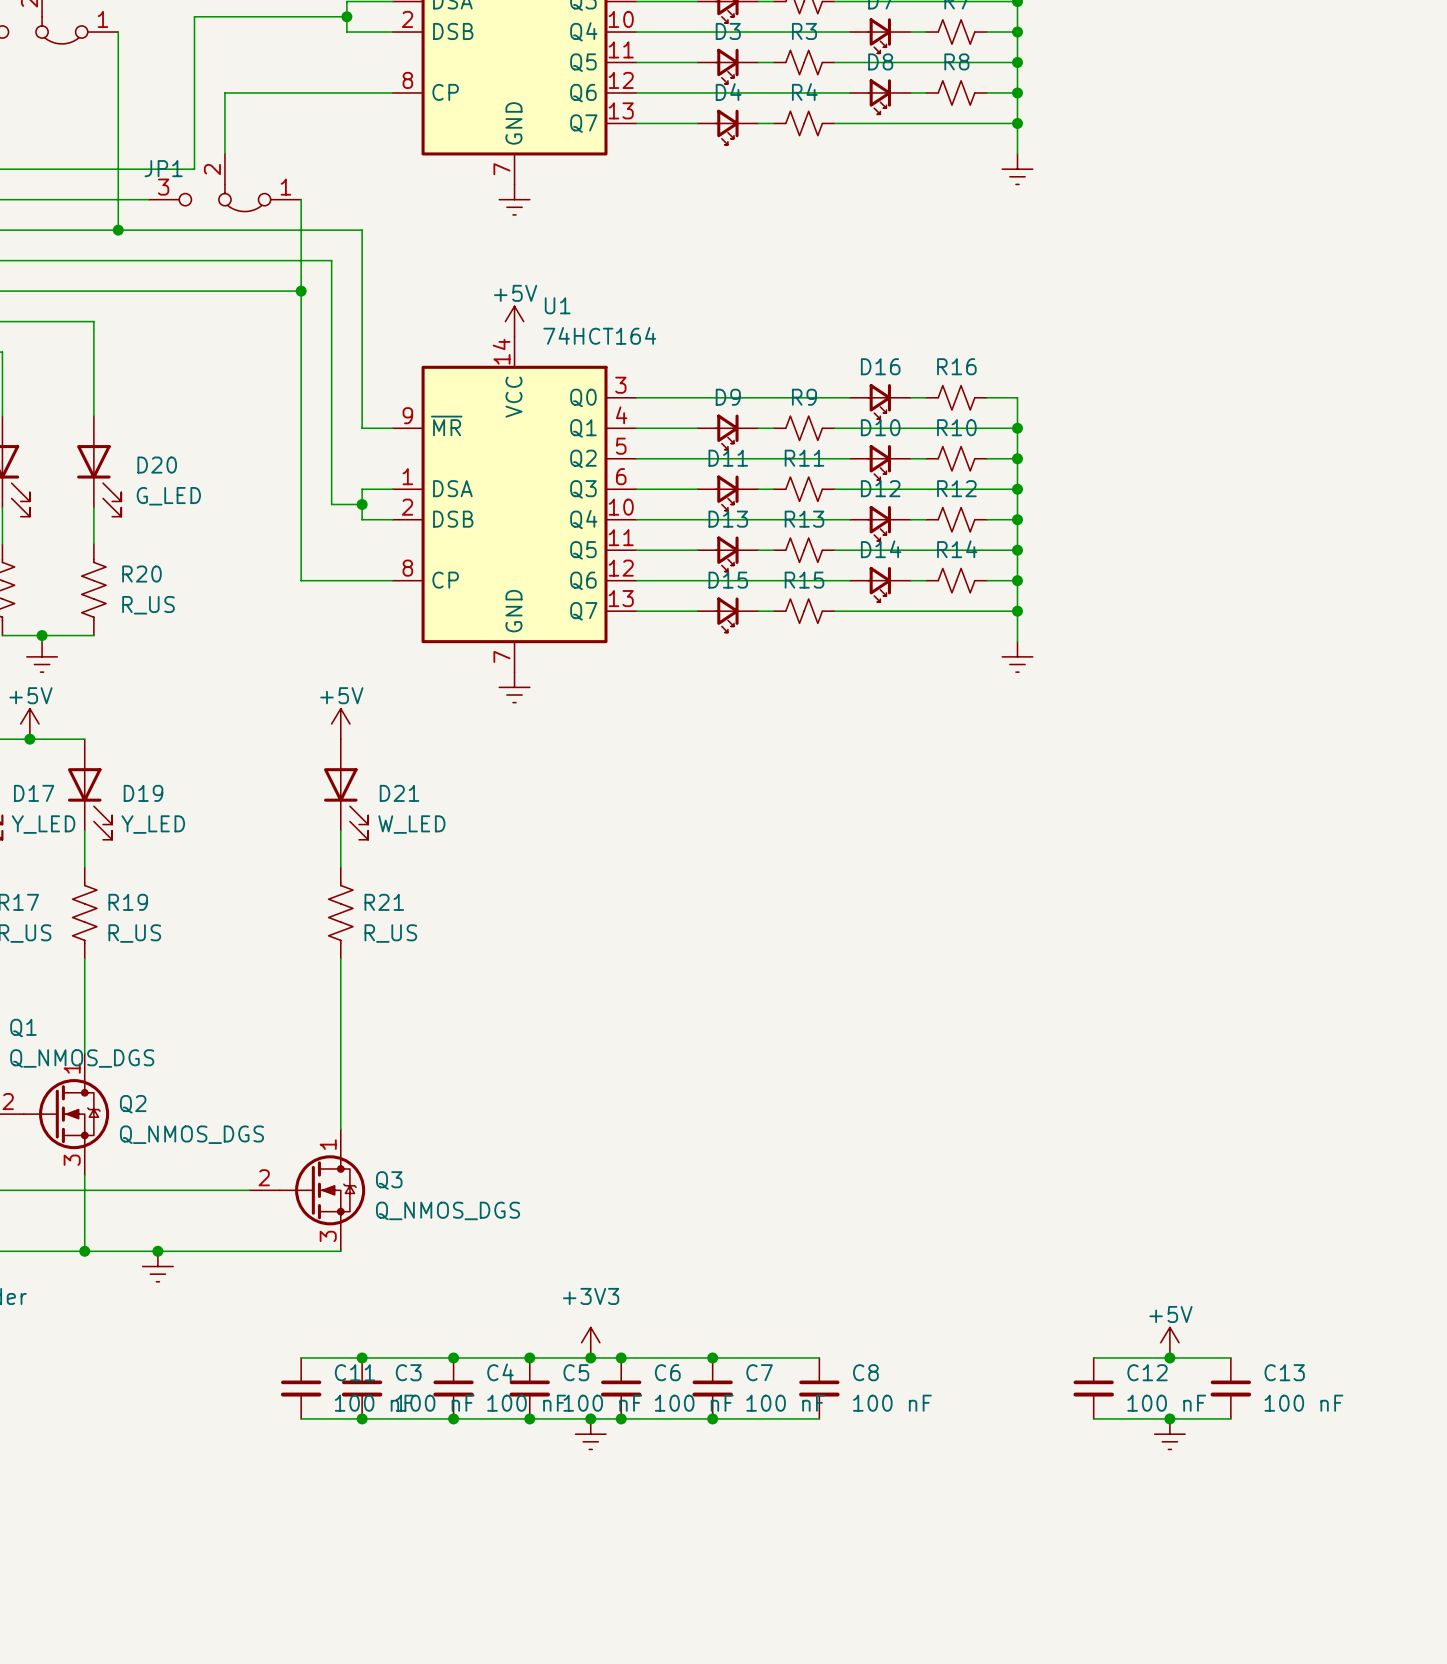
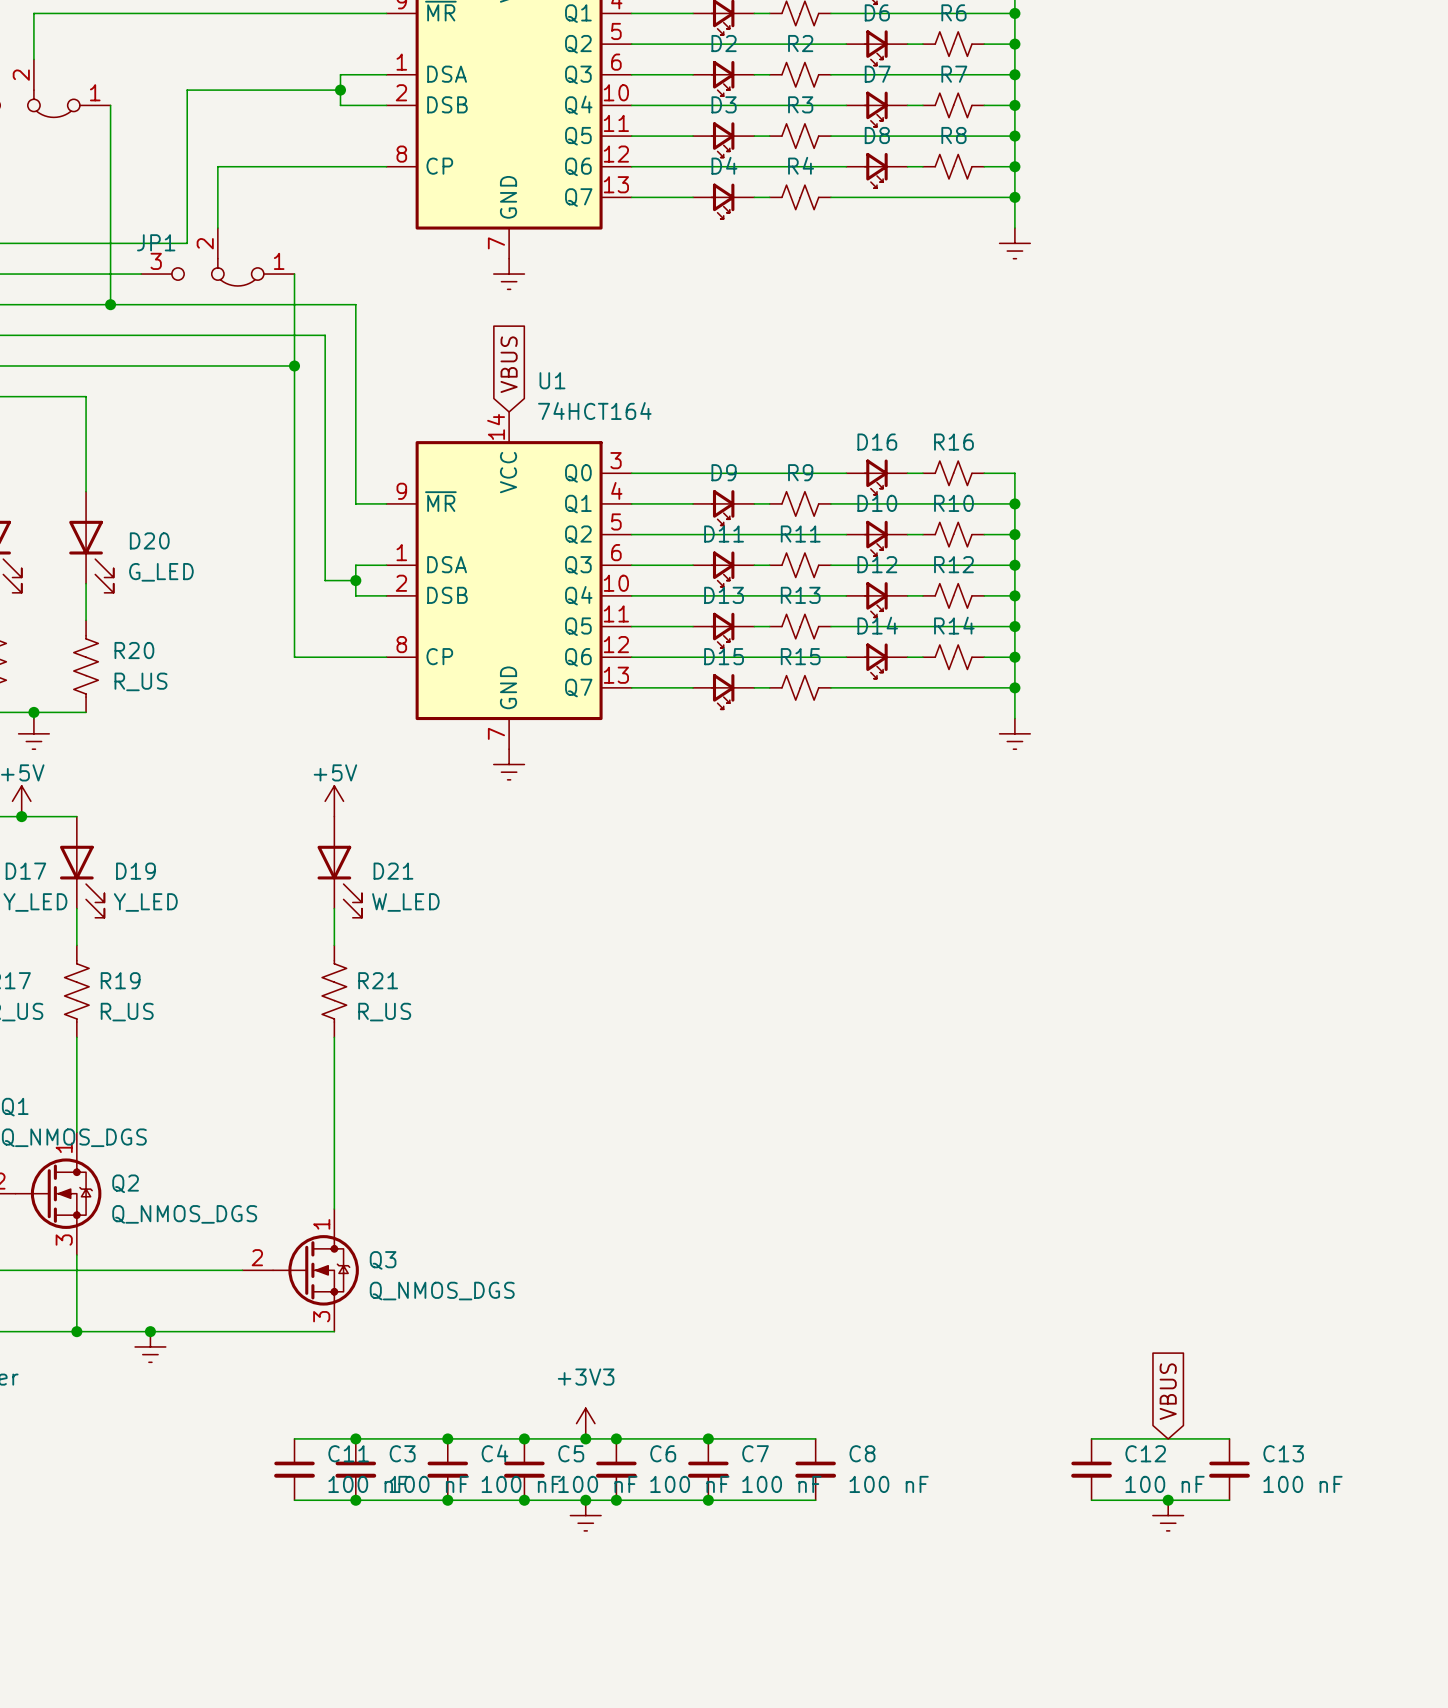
global label: none -> VBUS (509, 364)
power symbol: +5V (514, 321) -> none
global label: none -> VBUS (1168, 1391)
power symbol: +5V (1169, 1342) -> none
junction: (1169, 1357) -> none

